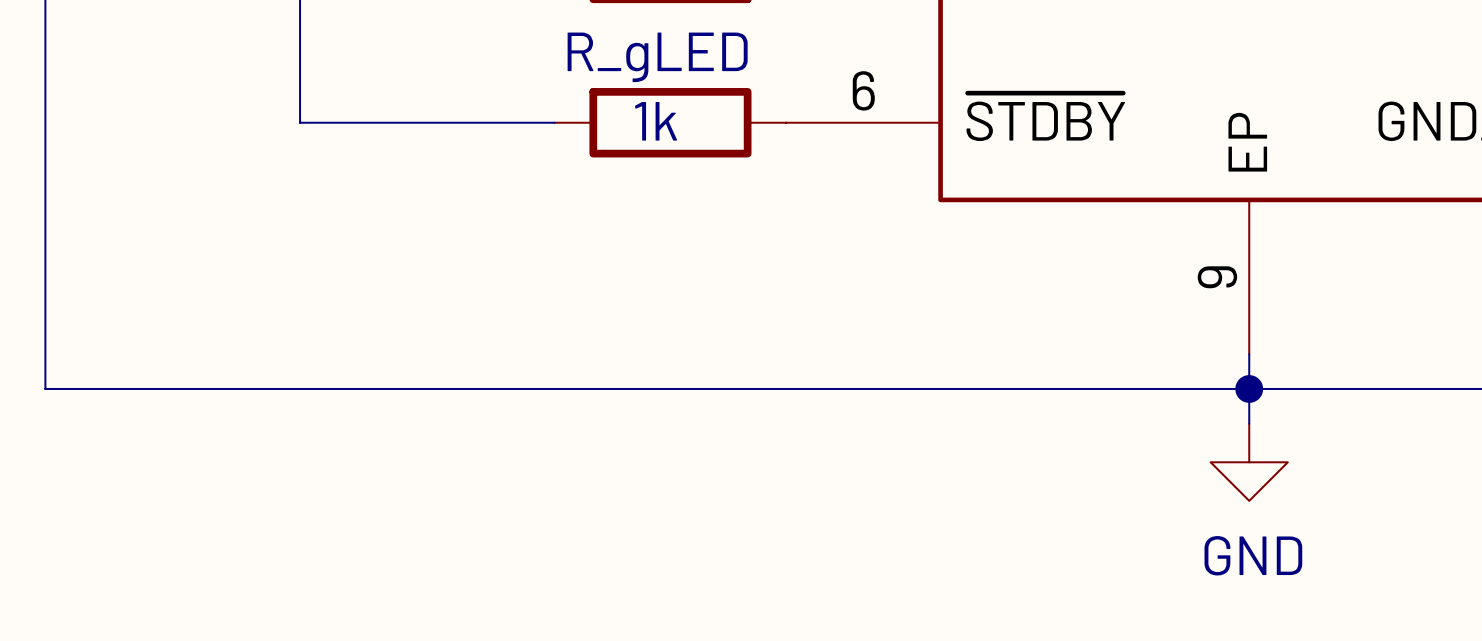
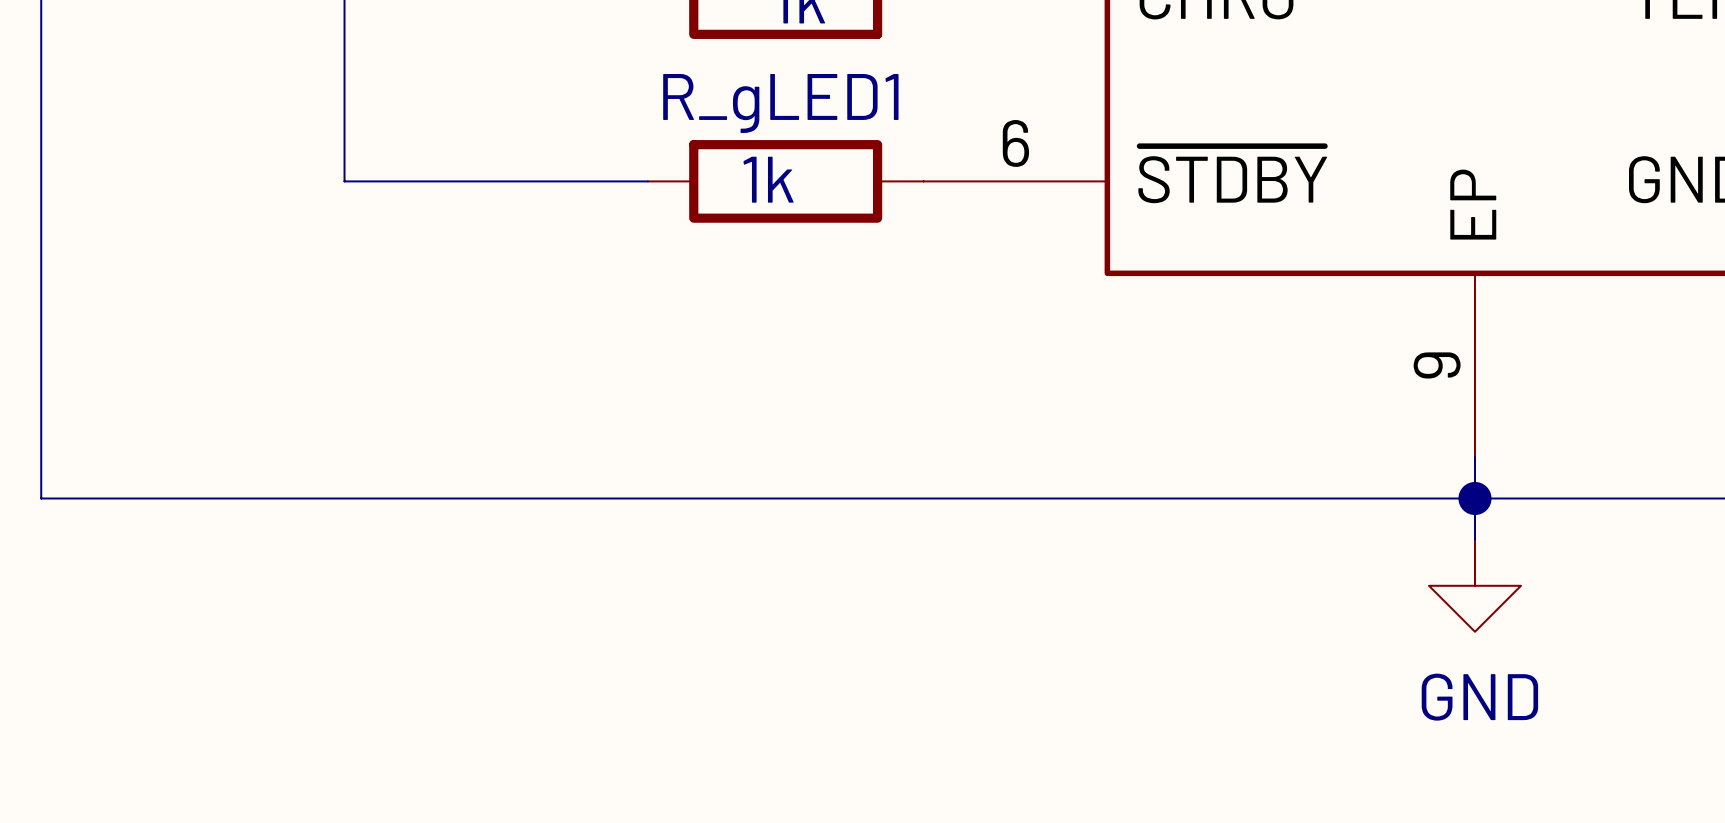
R_gLED name: R_gLED (657, 57) -> R_gLED1 (780, 103)

